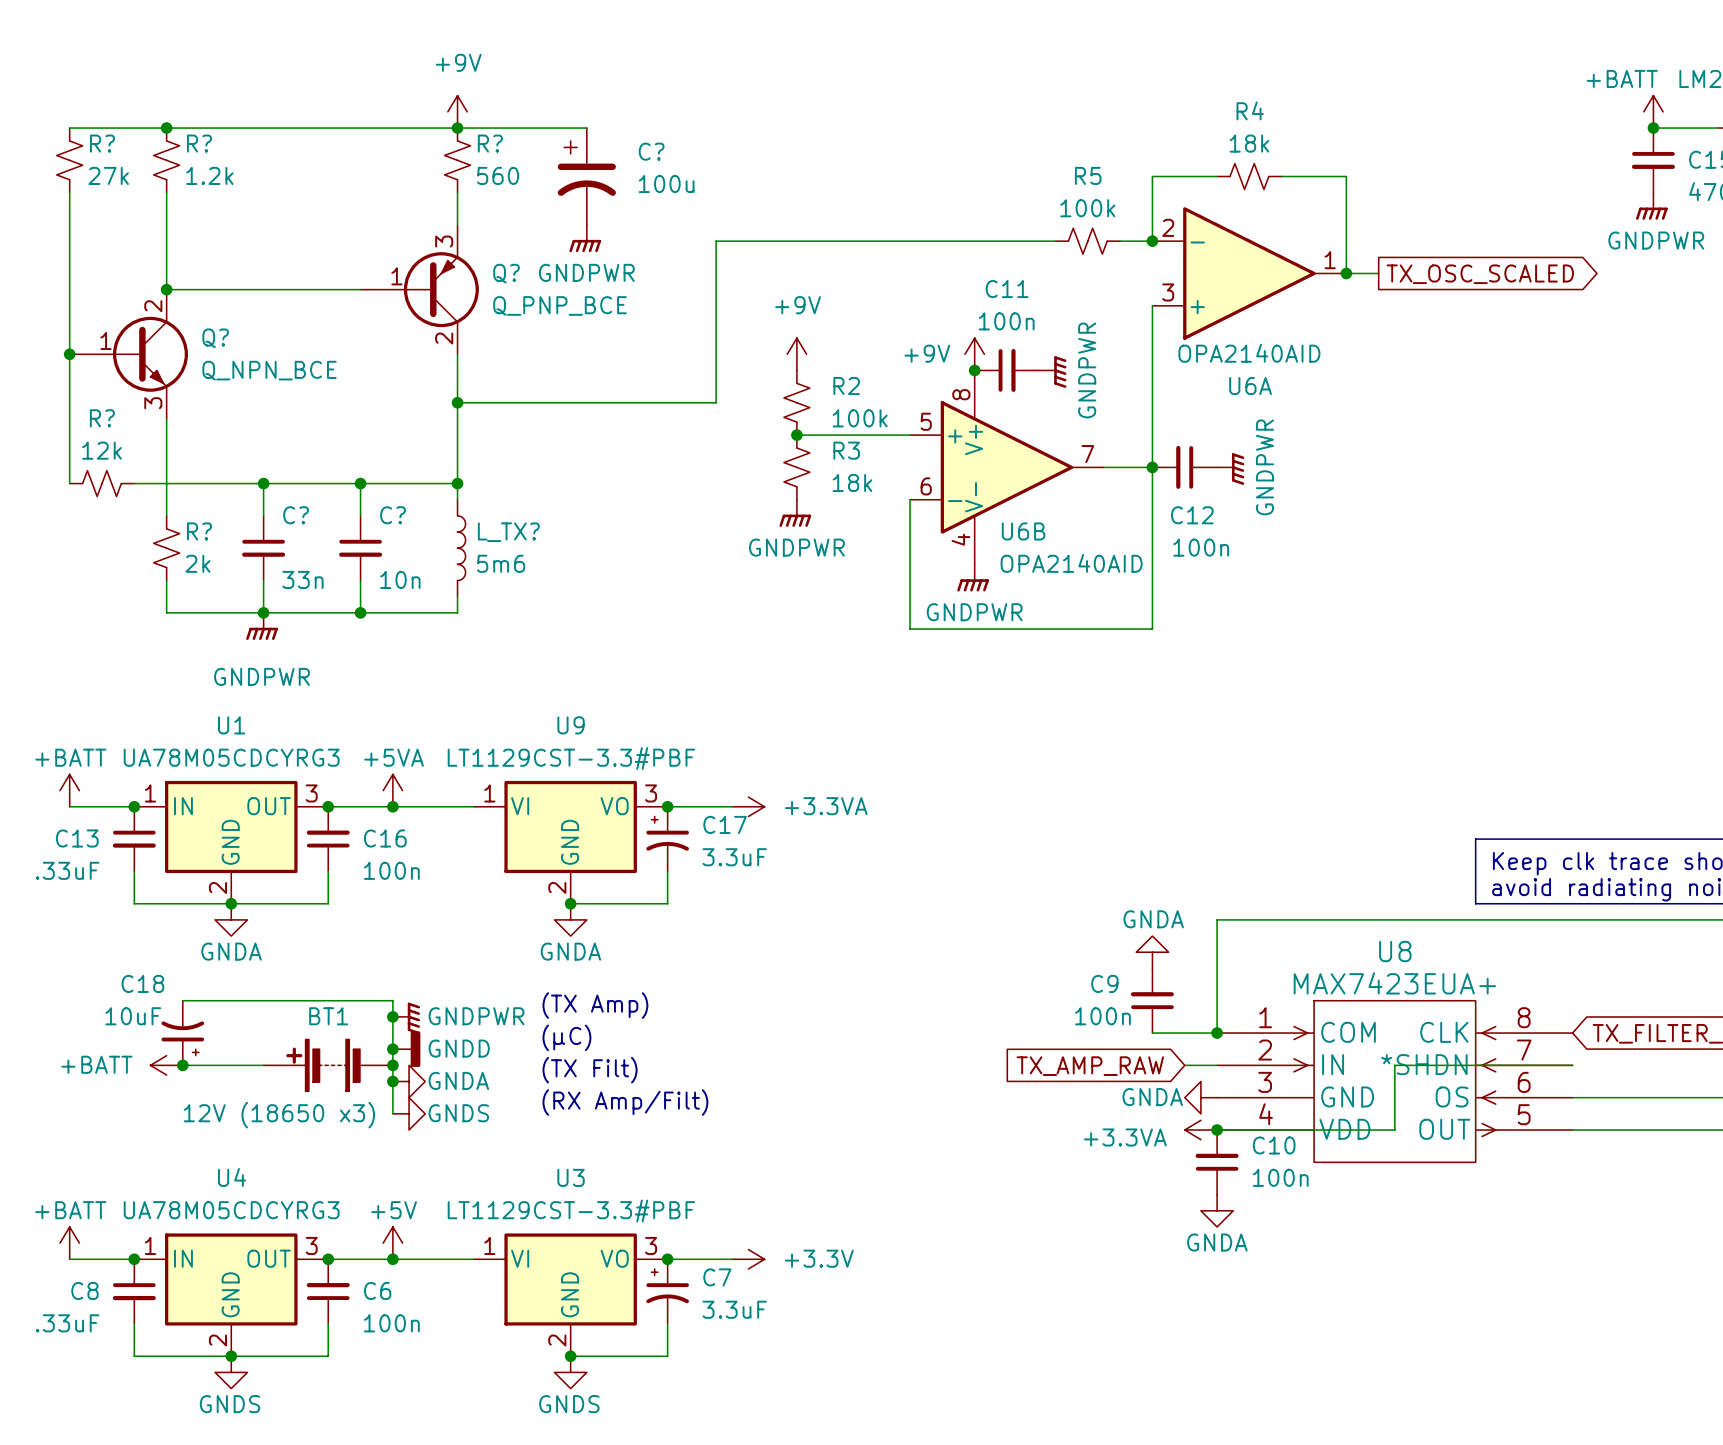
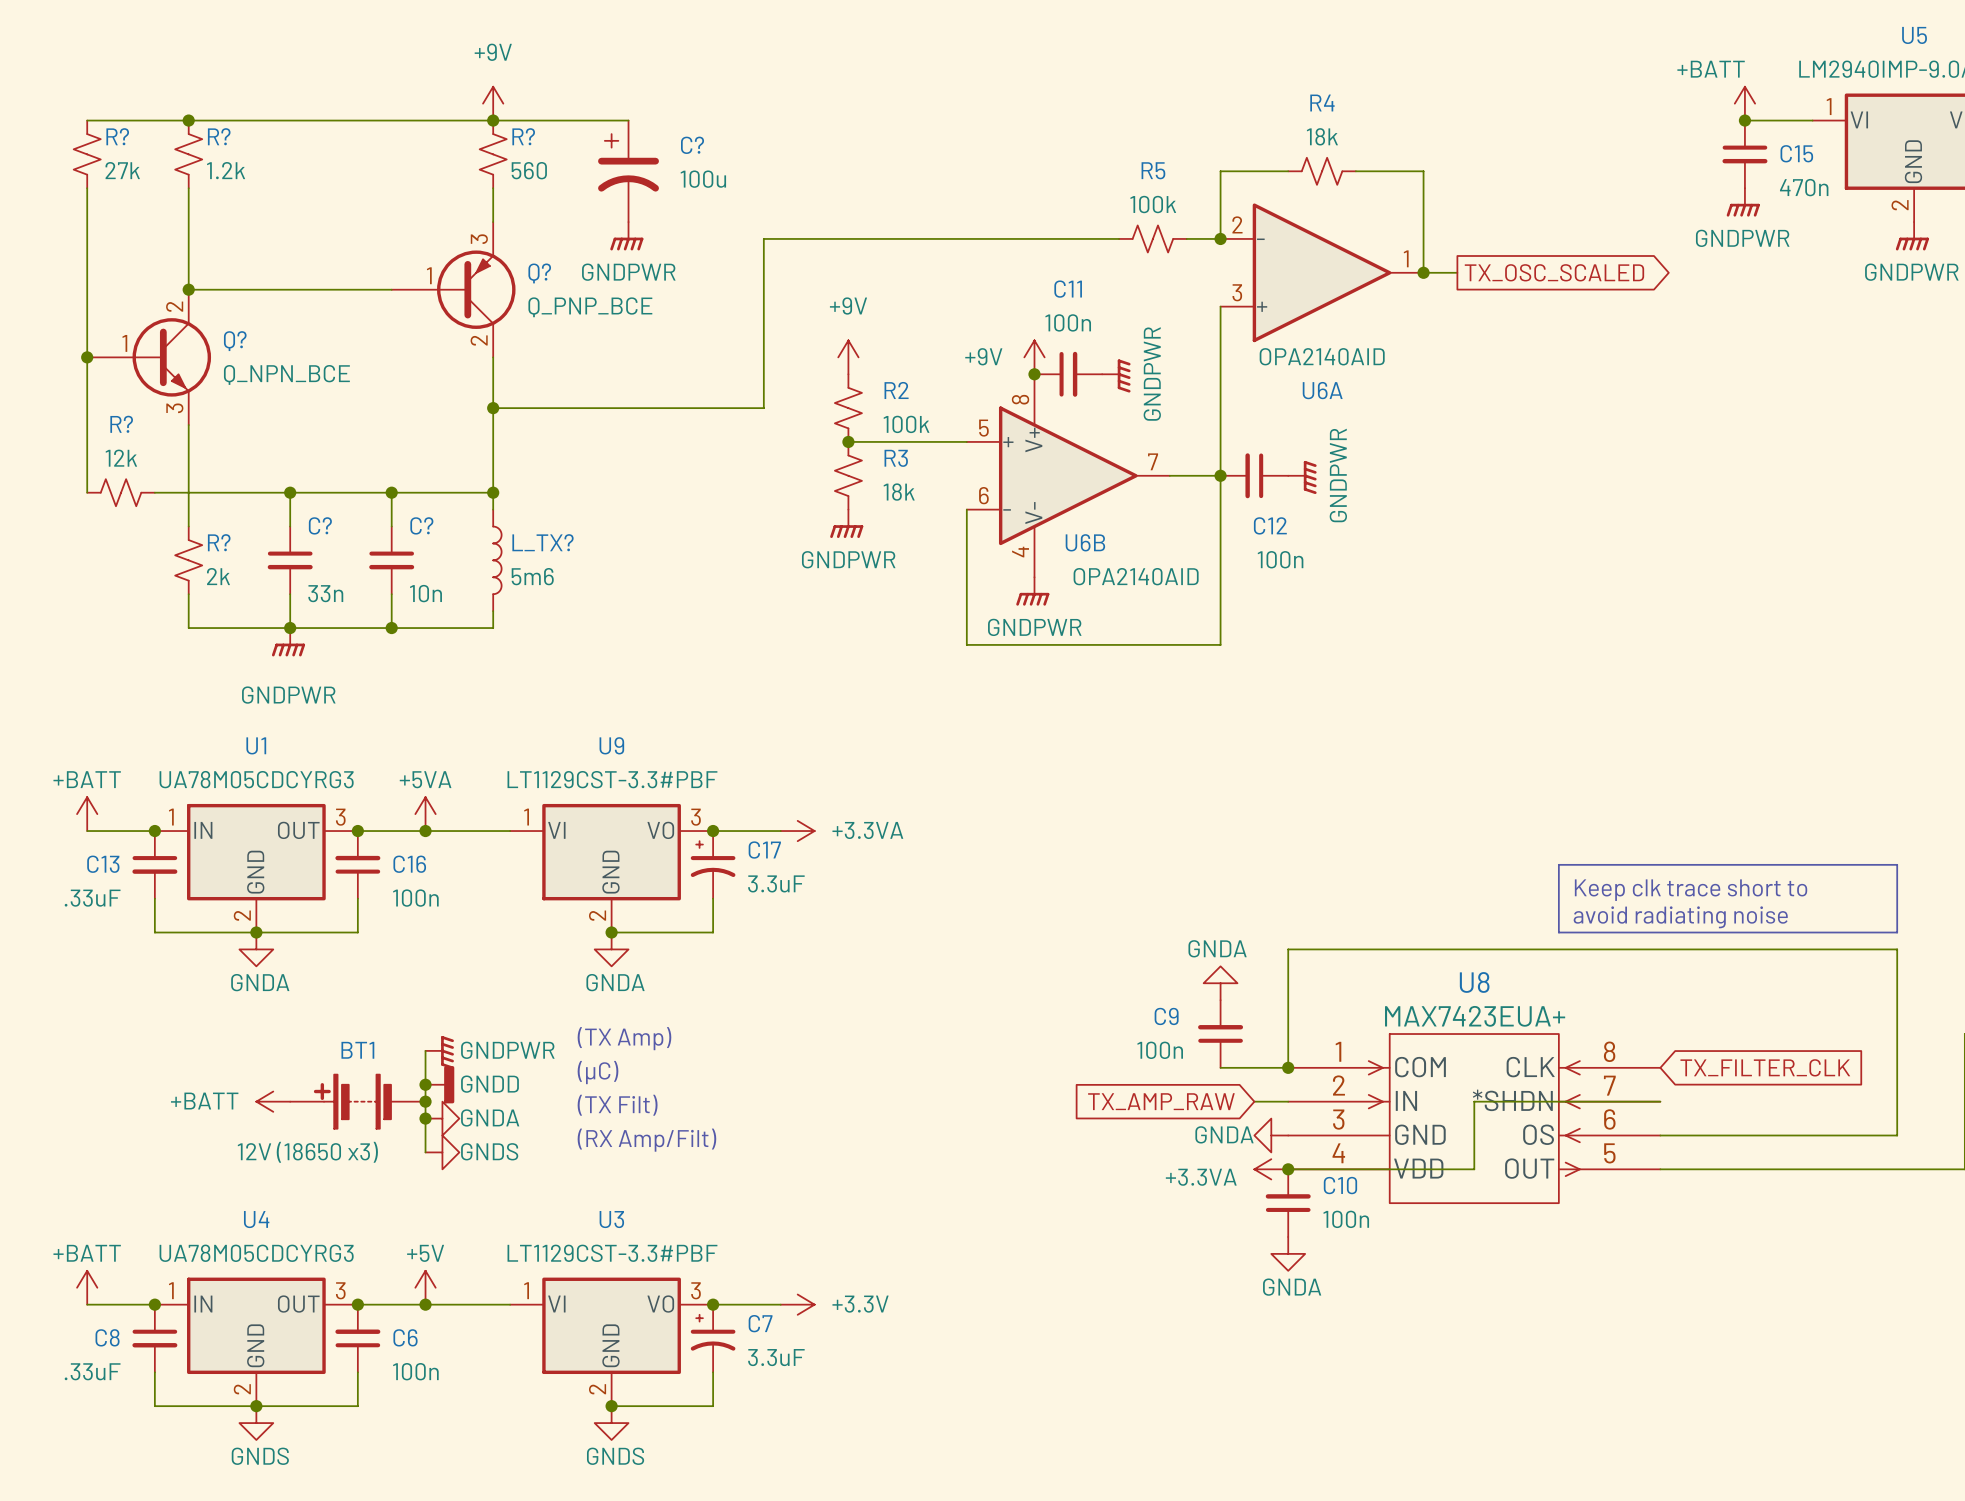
wire: (182, 1000) (392, 1000) (392, 1016) -> none
junction: (392, 1016) -> none
C18: 10uF (182, 1033) -> none
power symbol position: +BATT (166, 1065) -> +BATT (273, 1101)
wire: (182, 1065) (263, 1065) -> none
junction: (182, 1065) -> none

